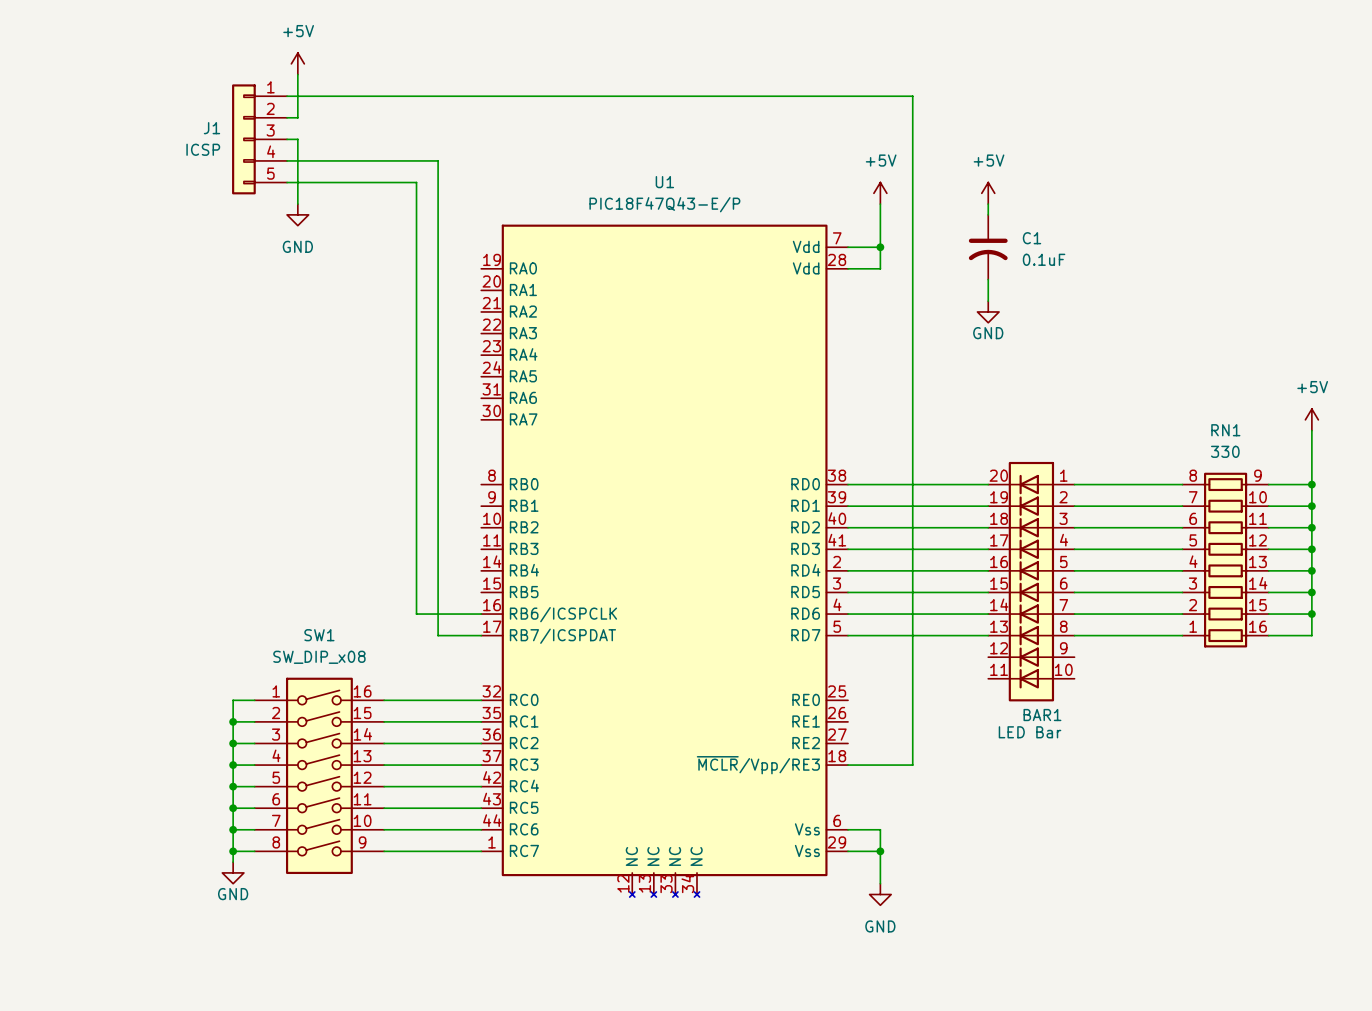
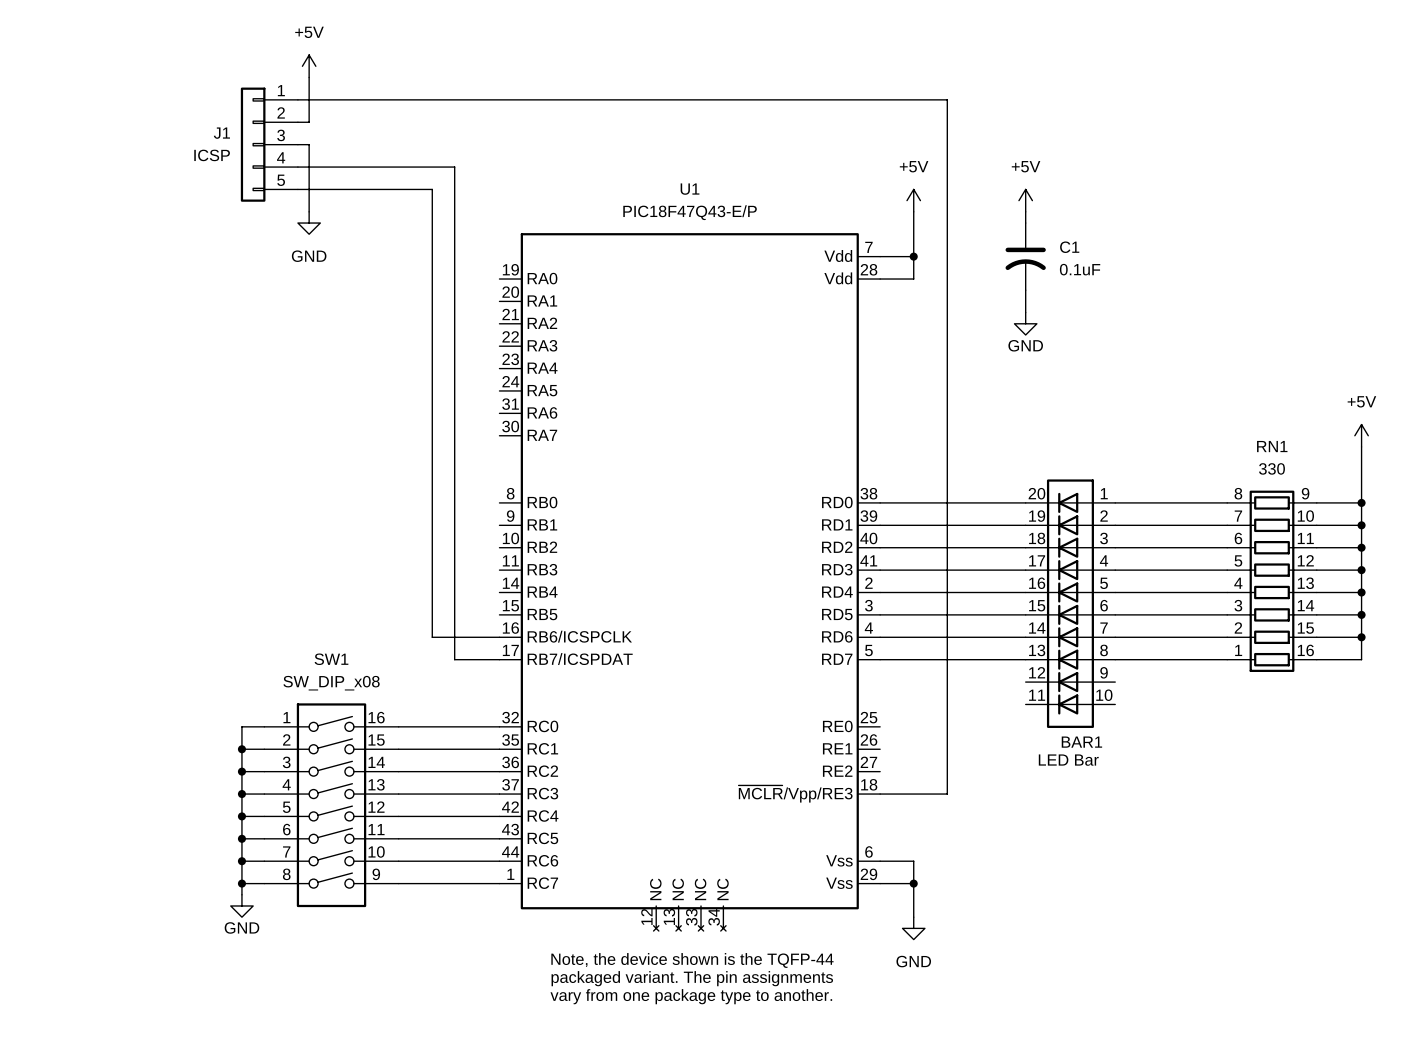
text: none -> Note, the device shown is the TQFP-44 (692, 960)
text: none -> packaged variant. The pin assignments (692, 978)
text: none -> vary from one package type to another. (691, 996)

